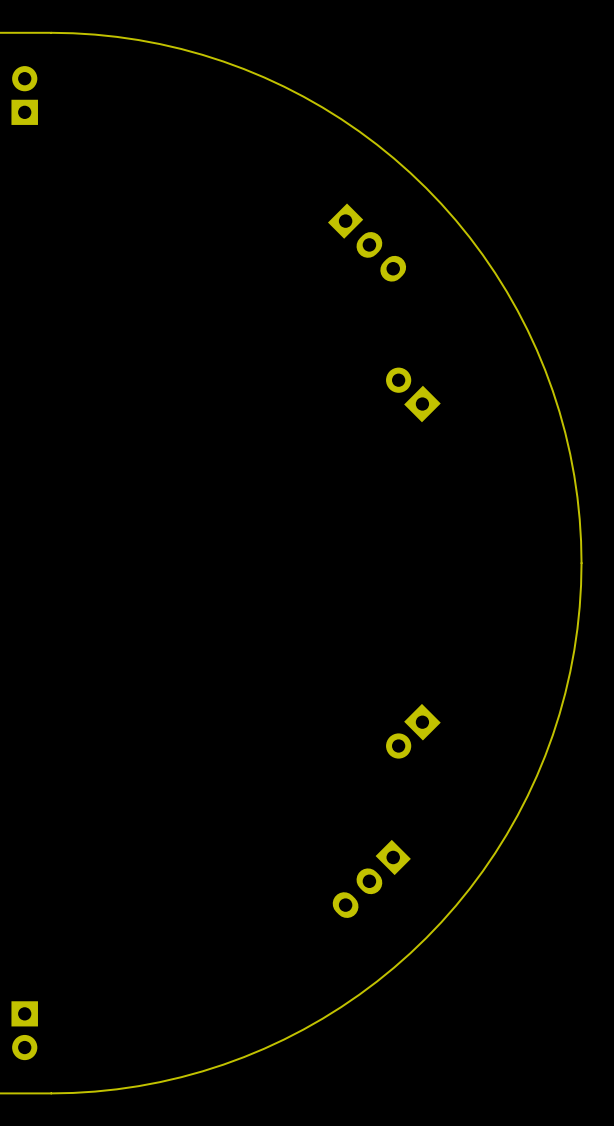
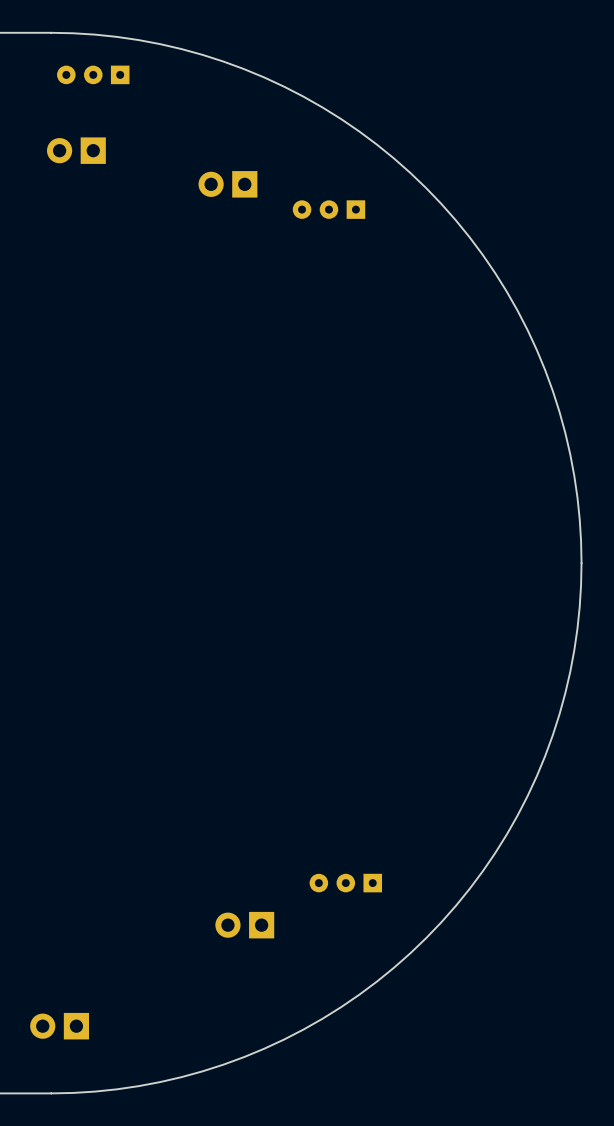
part: none -> (93, 74)
part rotation: 0° (24, 95) -> 90° counterclockwise (76, 150)
part position: (24, 95) -> (76, 150)
part: none -> (227, 184)
part: none -> (328, 209)
part: (367, 242) -> none
part: (413, 394) -> none
part: (413, 731) -> none
part: (371, 878) -> none
part: none -> (345, 883)
part: none -> (244, 925)
part rotation: 0° (24, 1030) -> 90° clockwise (59, 1026)

